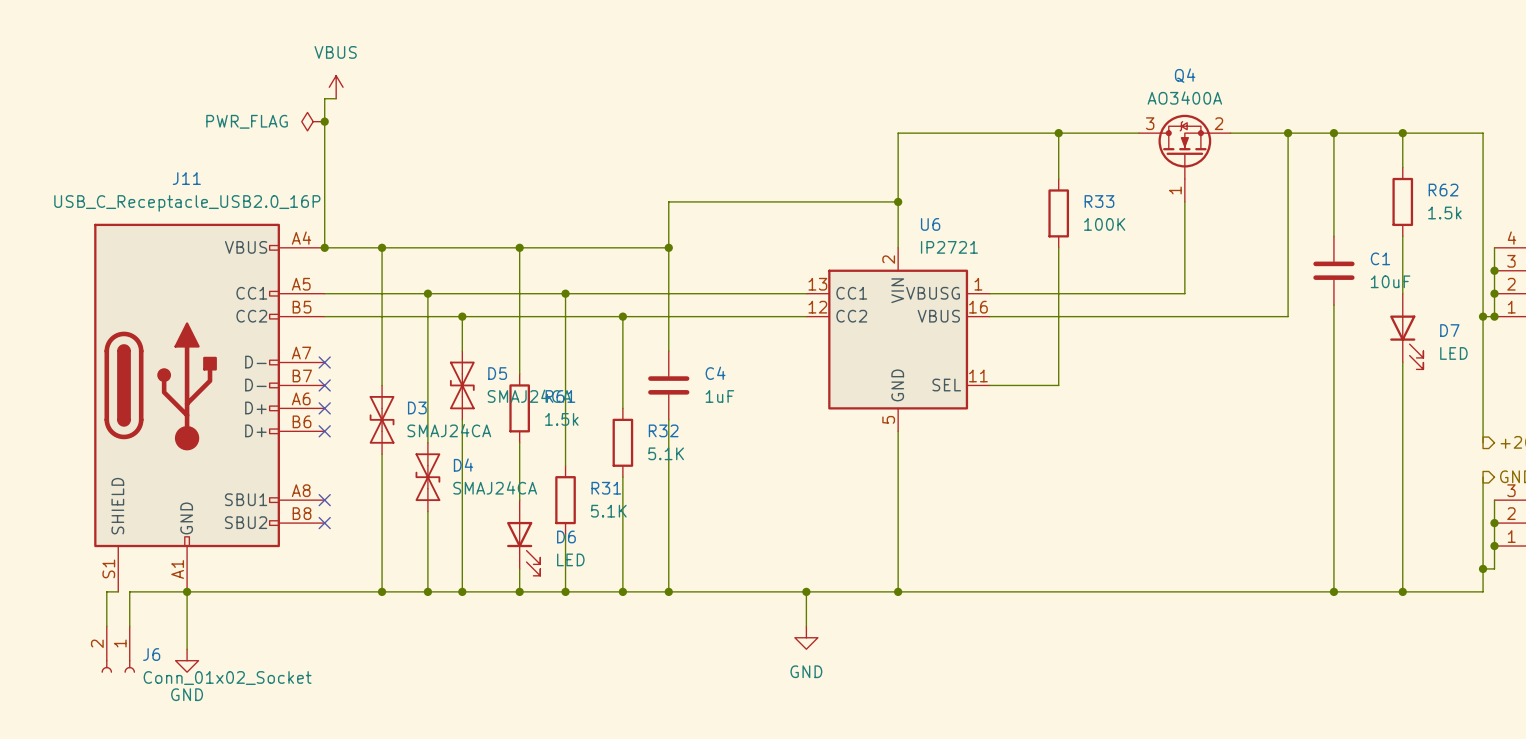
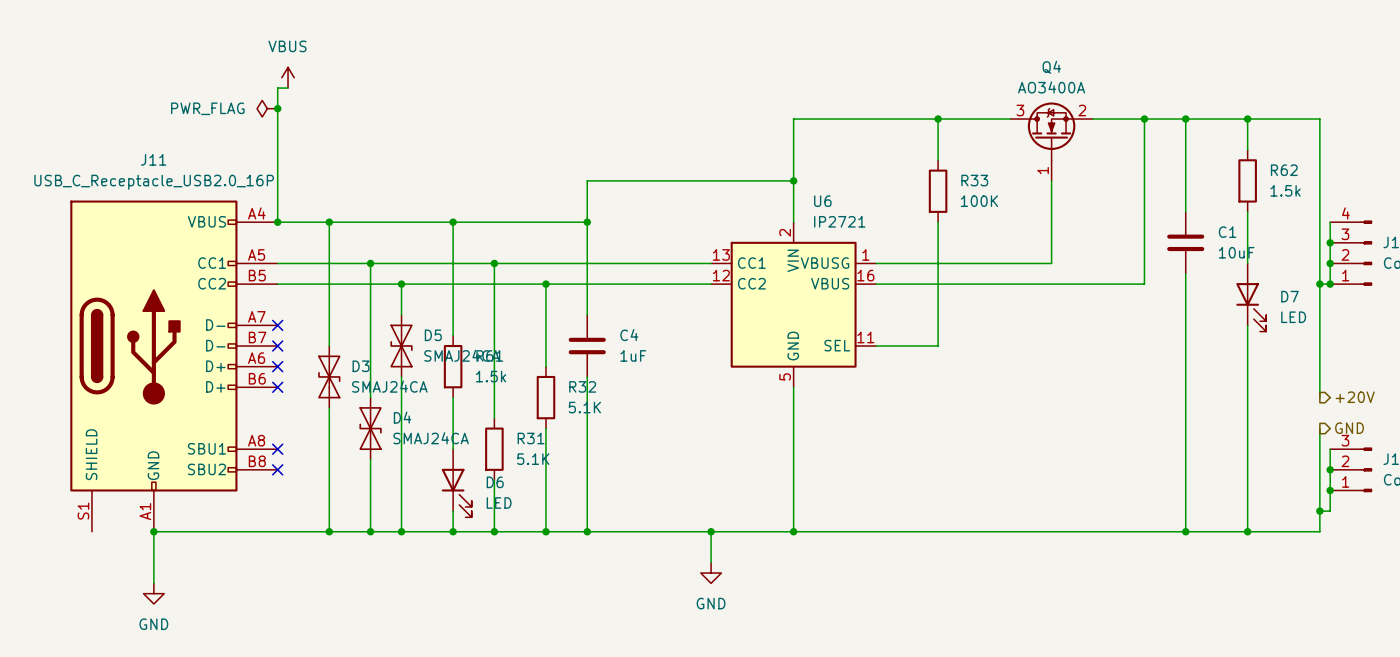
wire: (118, 591) (106, 591) (106, 626) -> none
wire: (187, 591) (129, 591) (129, 626) -> none
J6: Conn_01x02_Socket (118, 649) -> none

